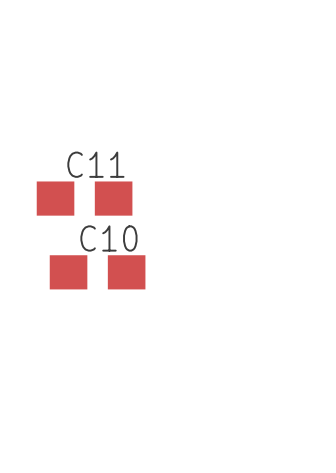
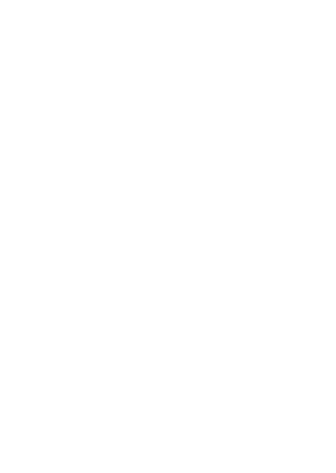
C11: (84, 198) -> none
C10: (97, 272) -> none

